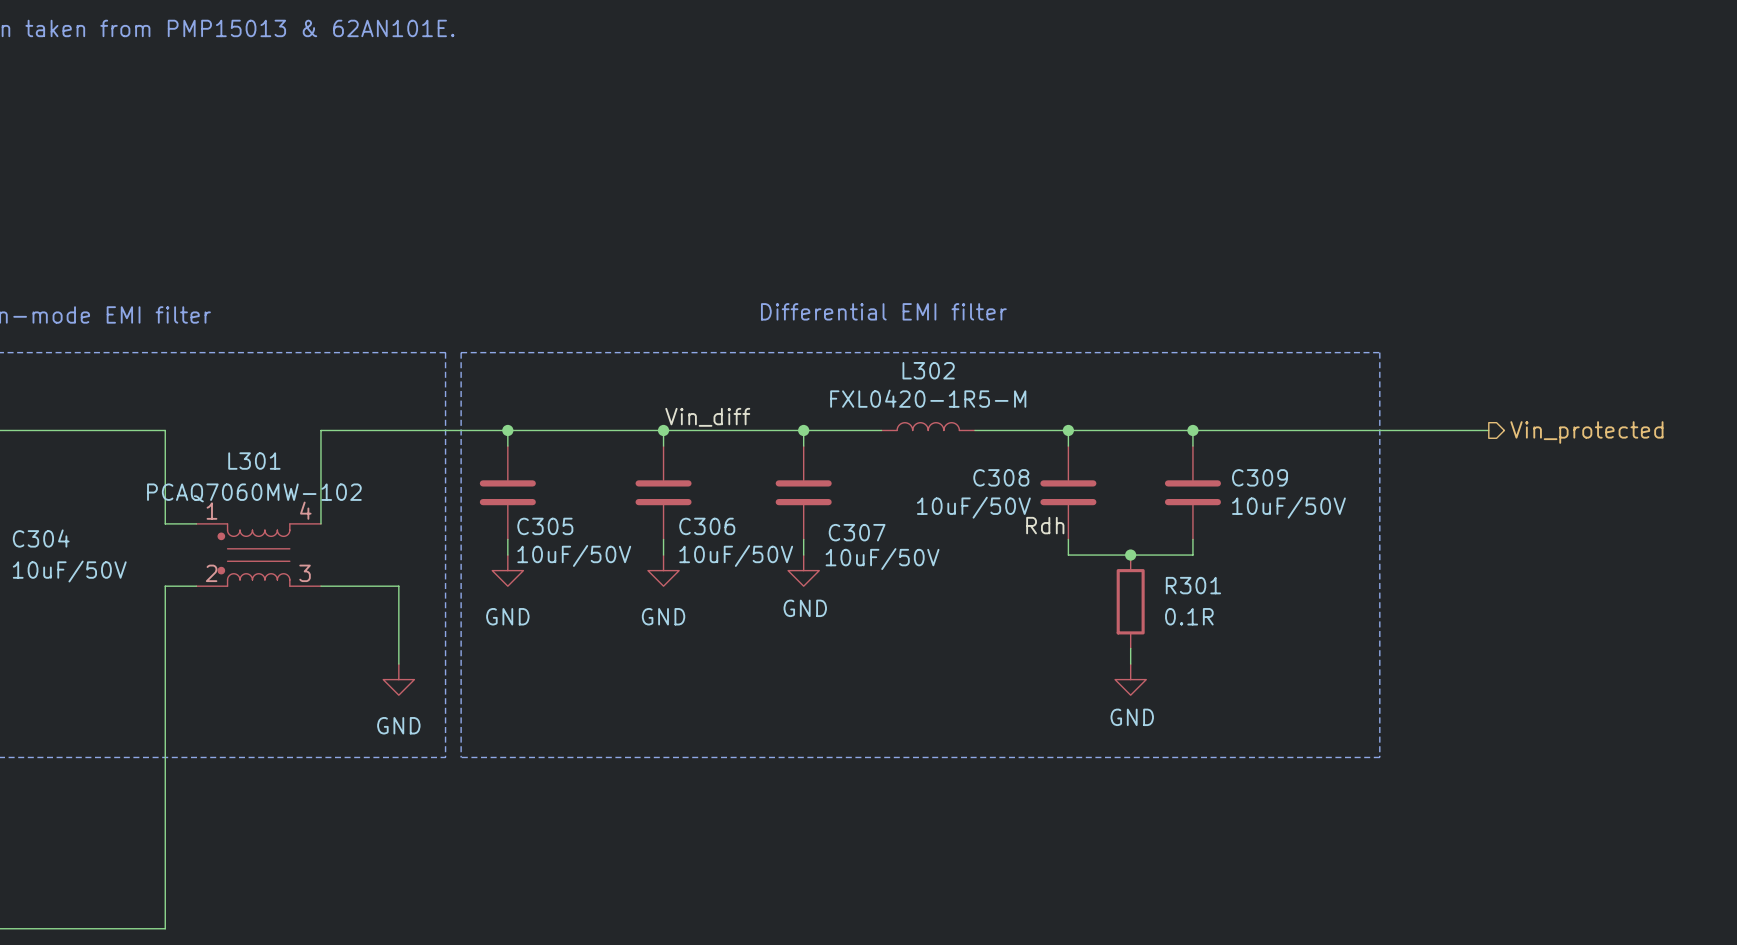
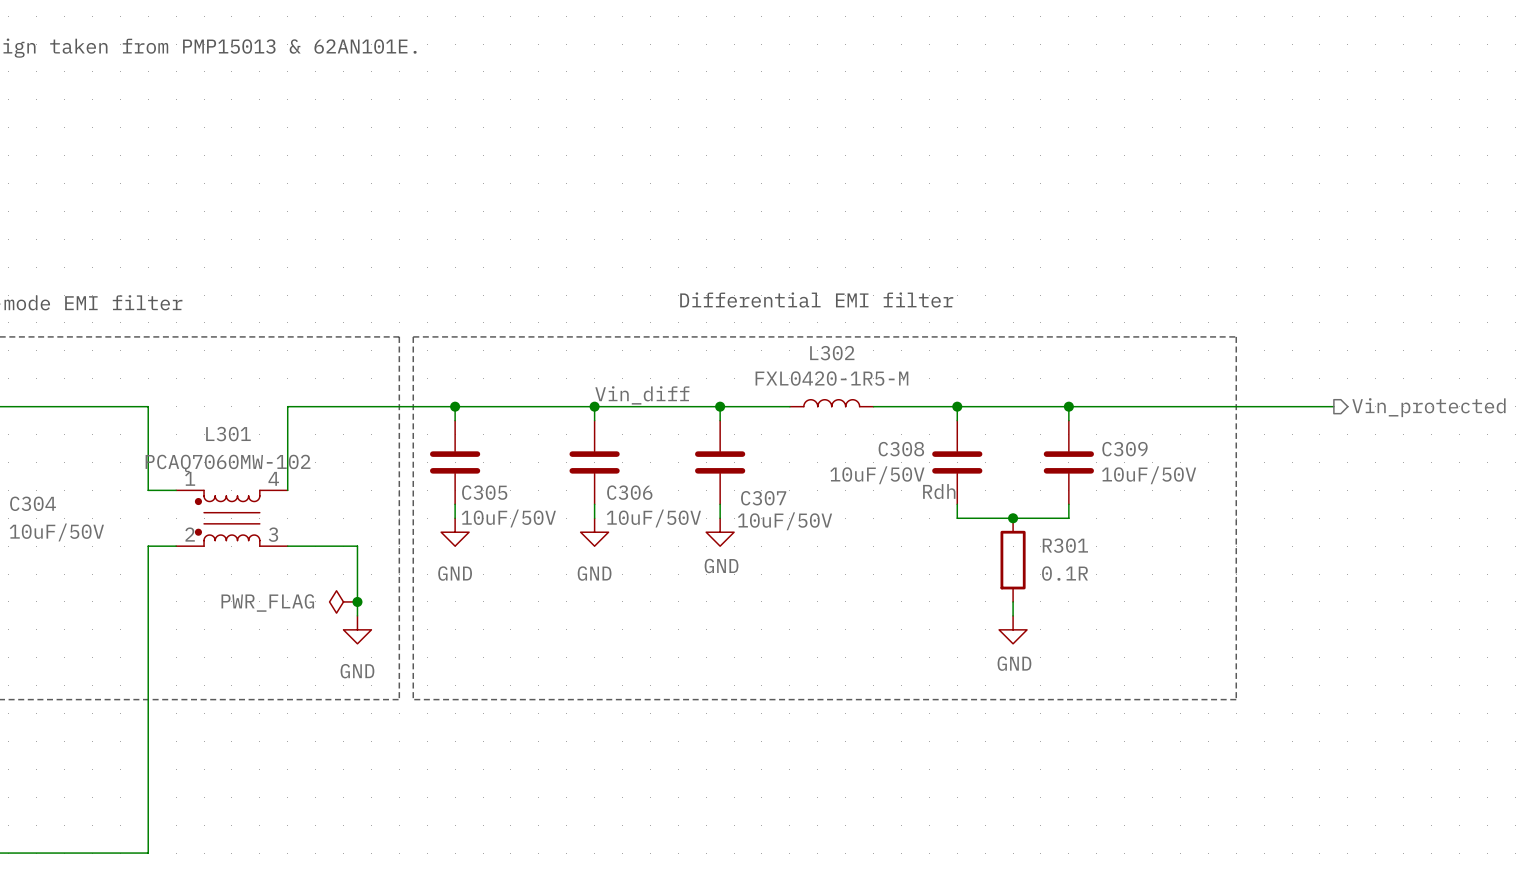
power symbol: none -> PWR_FLAG (343, 601)
junction: none -> (357, 601)

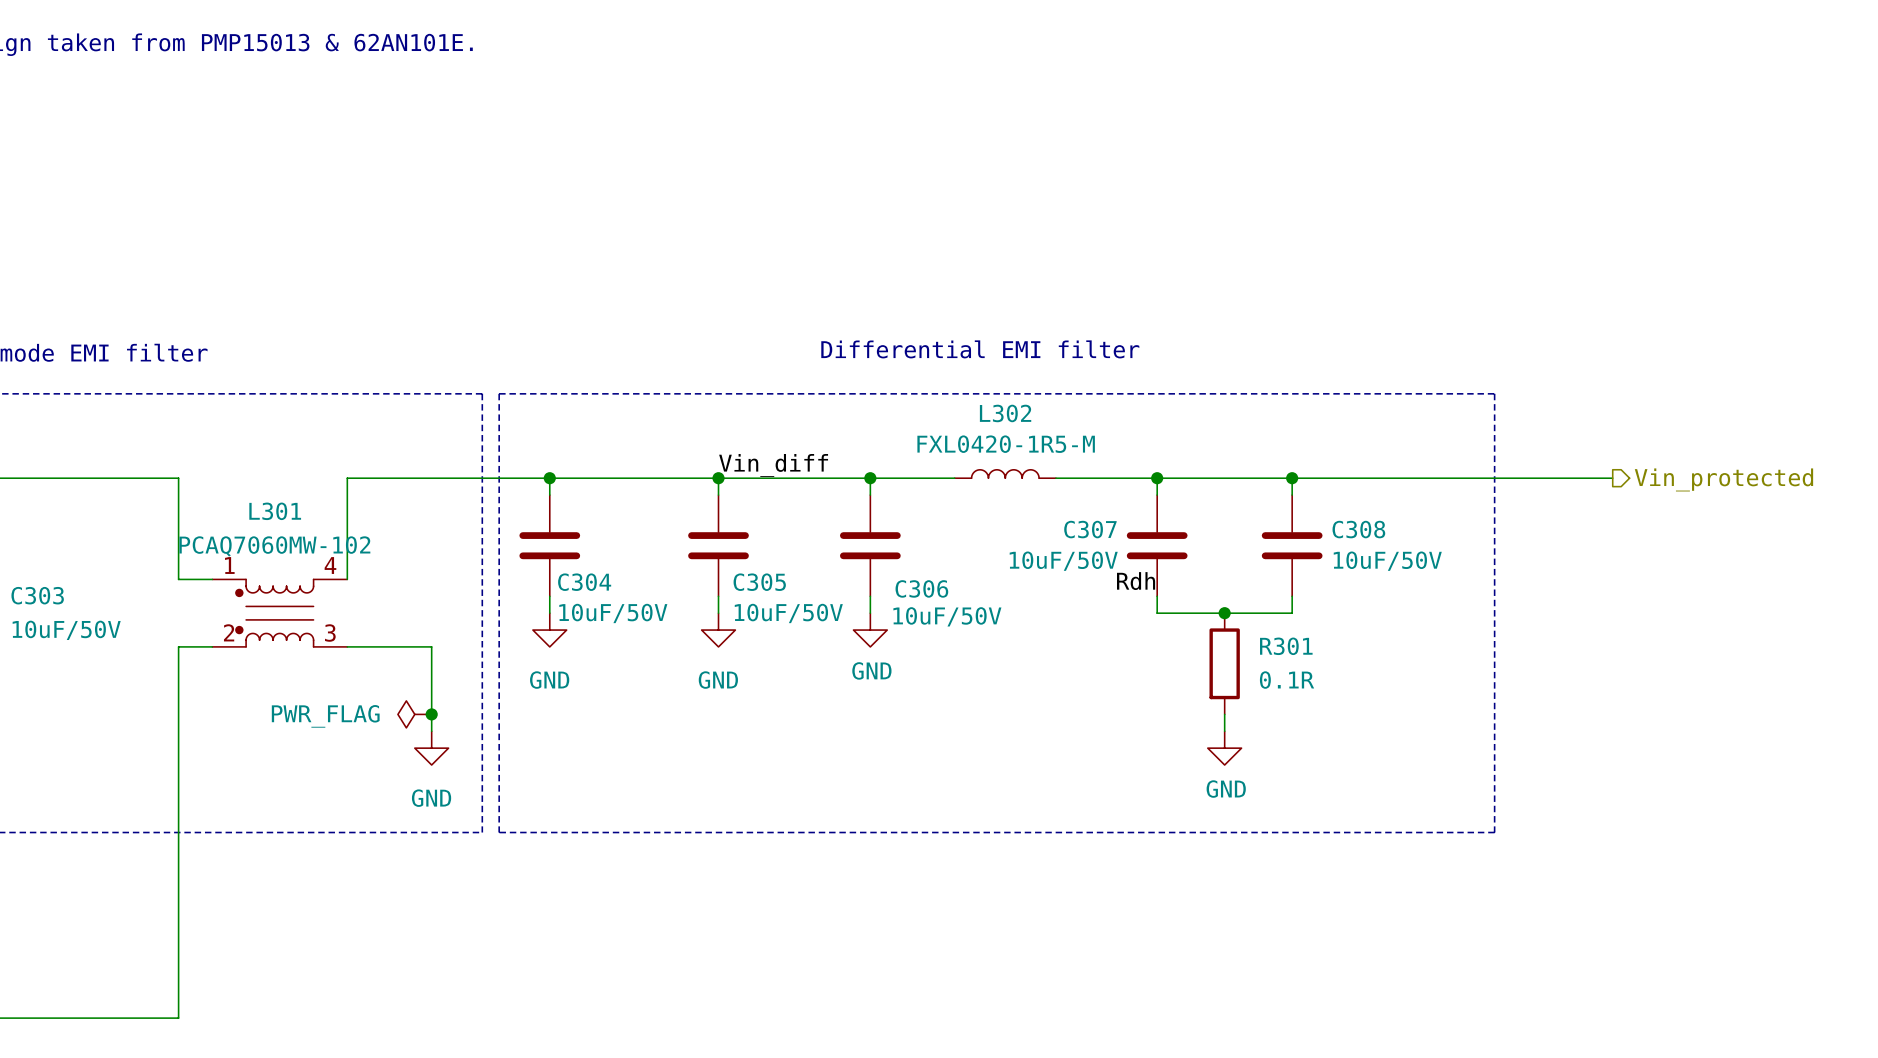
C308 name: C308 (901, 449) -> C307 (1090, 529)
C309 name: C309 (1124, 449) -> C308 (1358, 529)
C305 name: C305 (484, 492) -> C304 (584, 582)
C306 name: C306 (629, 492) -> C305 (759, 582)
C307 name: C307 (763, 498) -> C306 (921, 588)
C304 name: C304 (33, 503) -> C303 (37, 595)

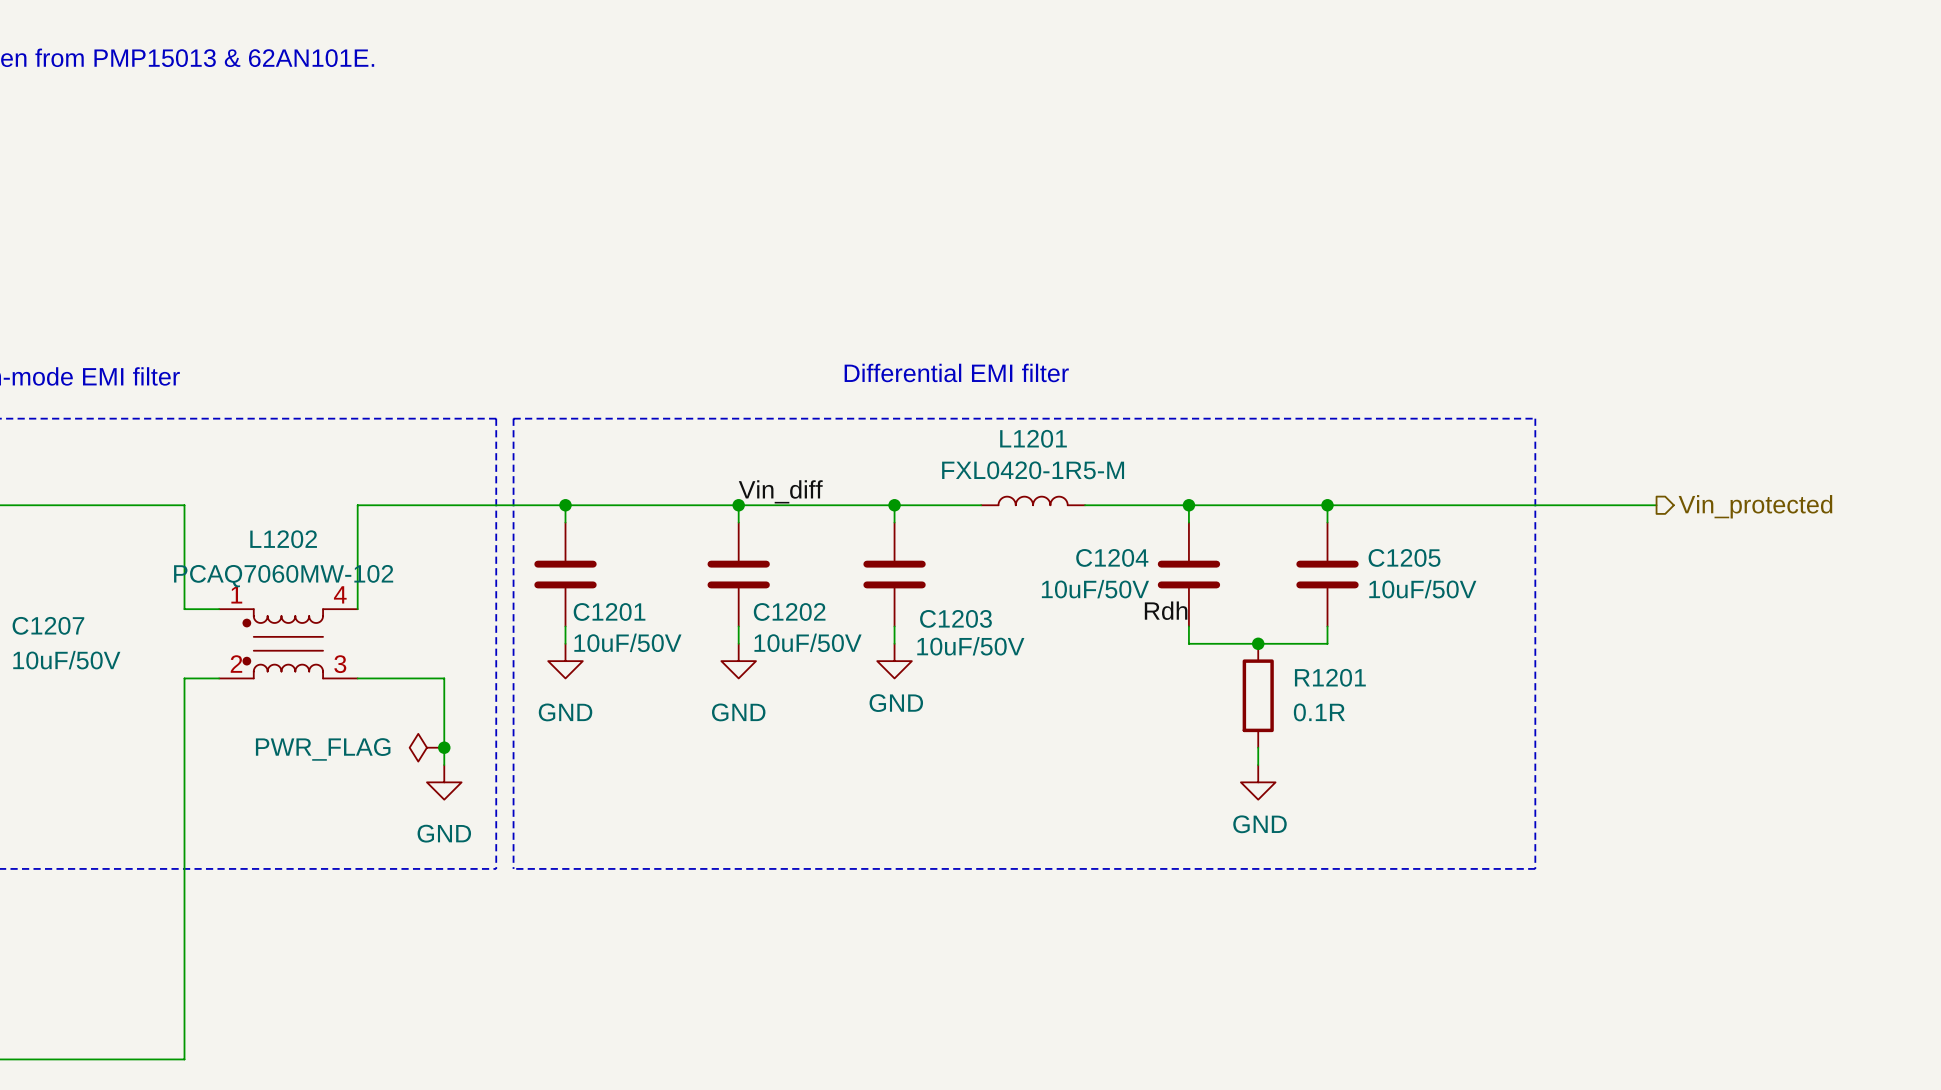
L302 name: L302 (1005, 413) -> L1201 (1033, 438)
L301 name: L301 (275, 511) -> L1202 (283, 539)
C307 name: C307 (1090, 529) -> C1204 (1112, 557)
C308 name: C308 (1358, 529) -> C1205 (1404, 557)
C304 name: C304 (584, 582) -> C1201 (609, 611)
C305 name: C305 (759, 582) -> C1202 (789, 611)
C306 name: C306 (921, 588) -> C1203 (955, 618)
C303 name: C303 (37, 595) -> C1207 (48, 625)
R301 name: R301 (1286, 646) -> R1201 (1330, 677)

